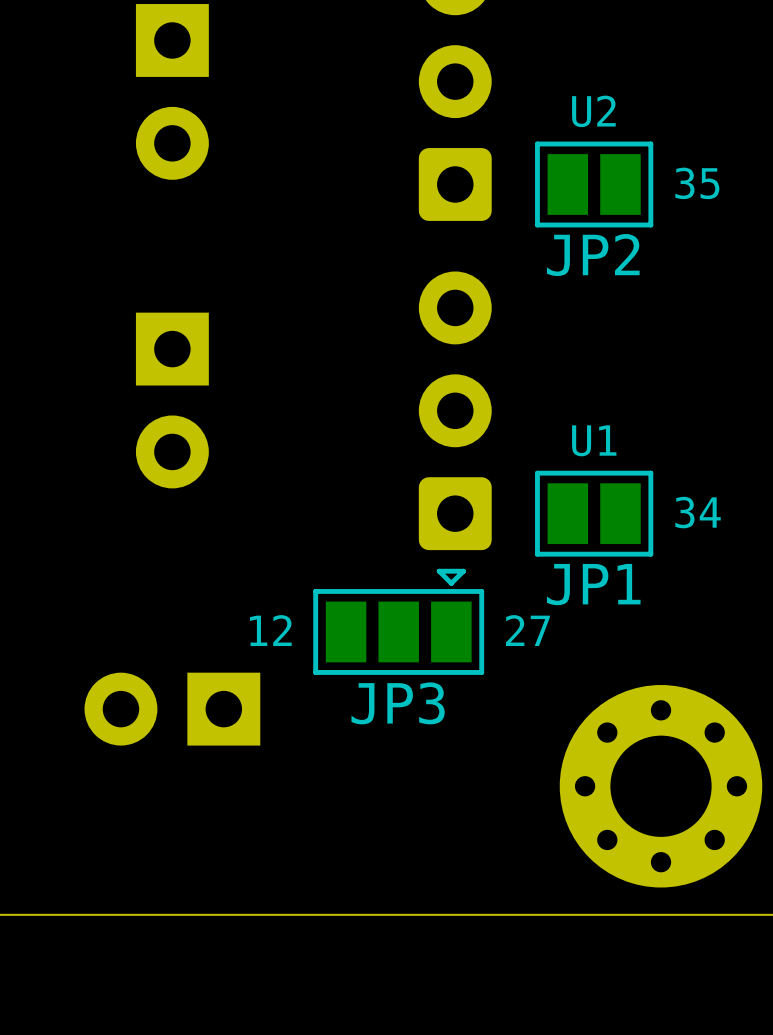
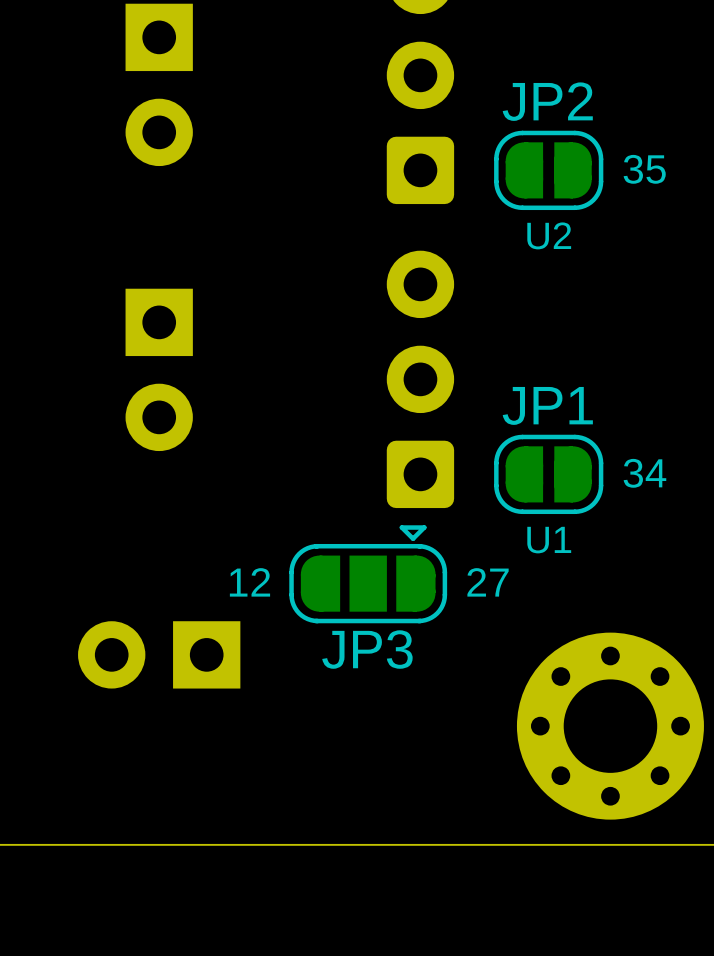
text: U2 (593, 111) -> none
JP2 footprint: [535, 141, 654, 228] -> [494, 130, 604, 211]
JP2 name position: JP2 (593, 255) -> JP2 (547, 101)
text: U1 (594, 440) -> none
JP1 footprint: [535, 470, 654, 557] -> [494, 434, 604, 515]
JP3 footprint: [313, 568, 485, 675] -> [289, 525, 448, 624]
JP1 name position: JP1 (593, 584) -> JP1 (547, 405)

